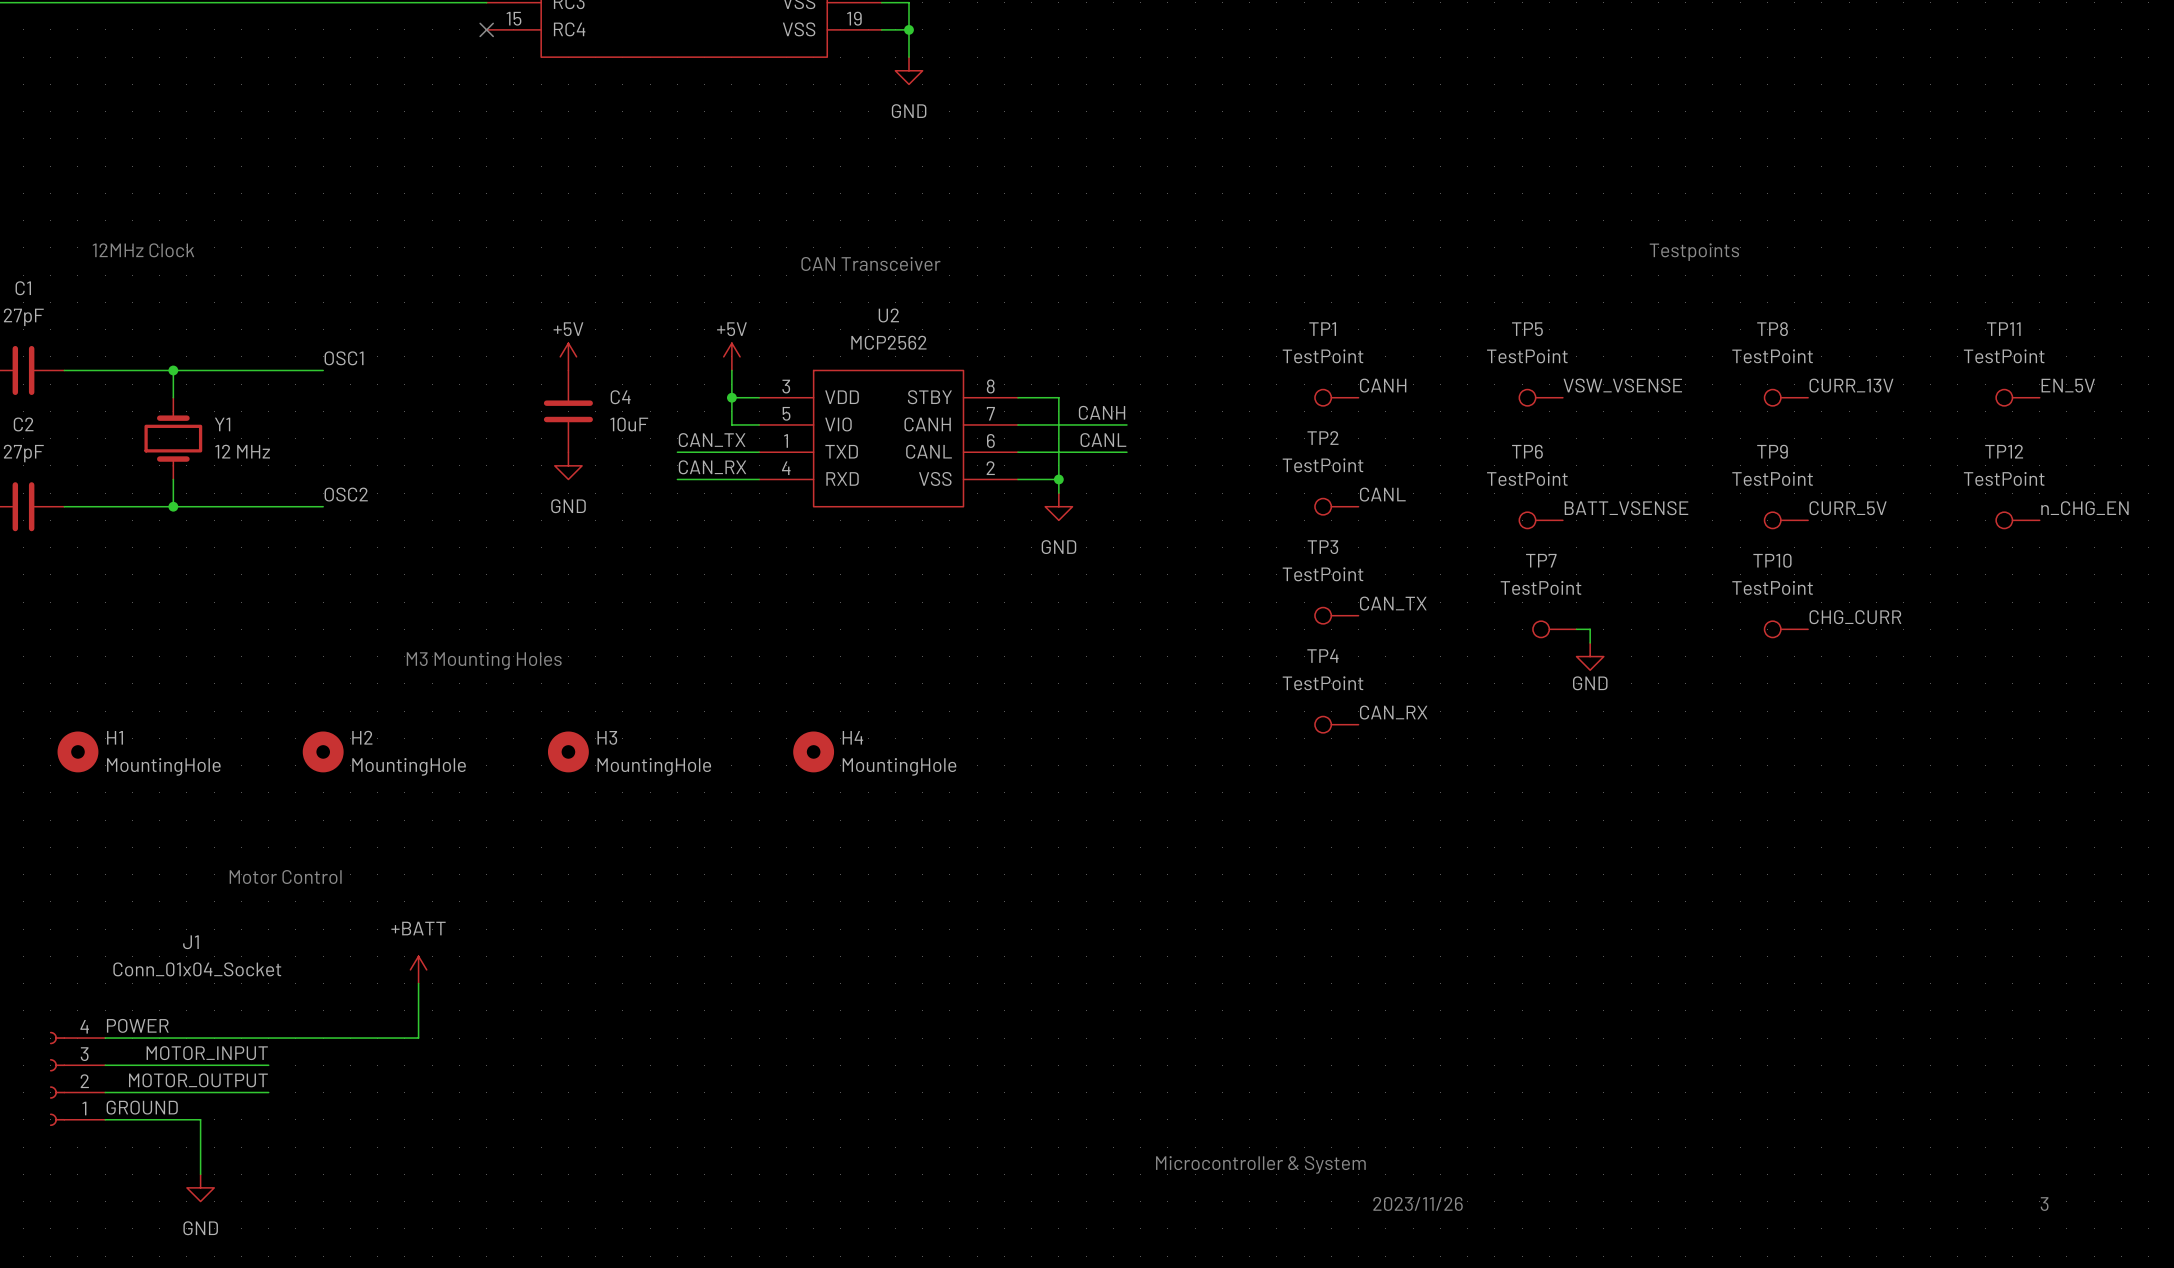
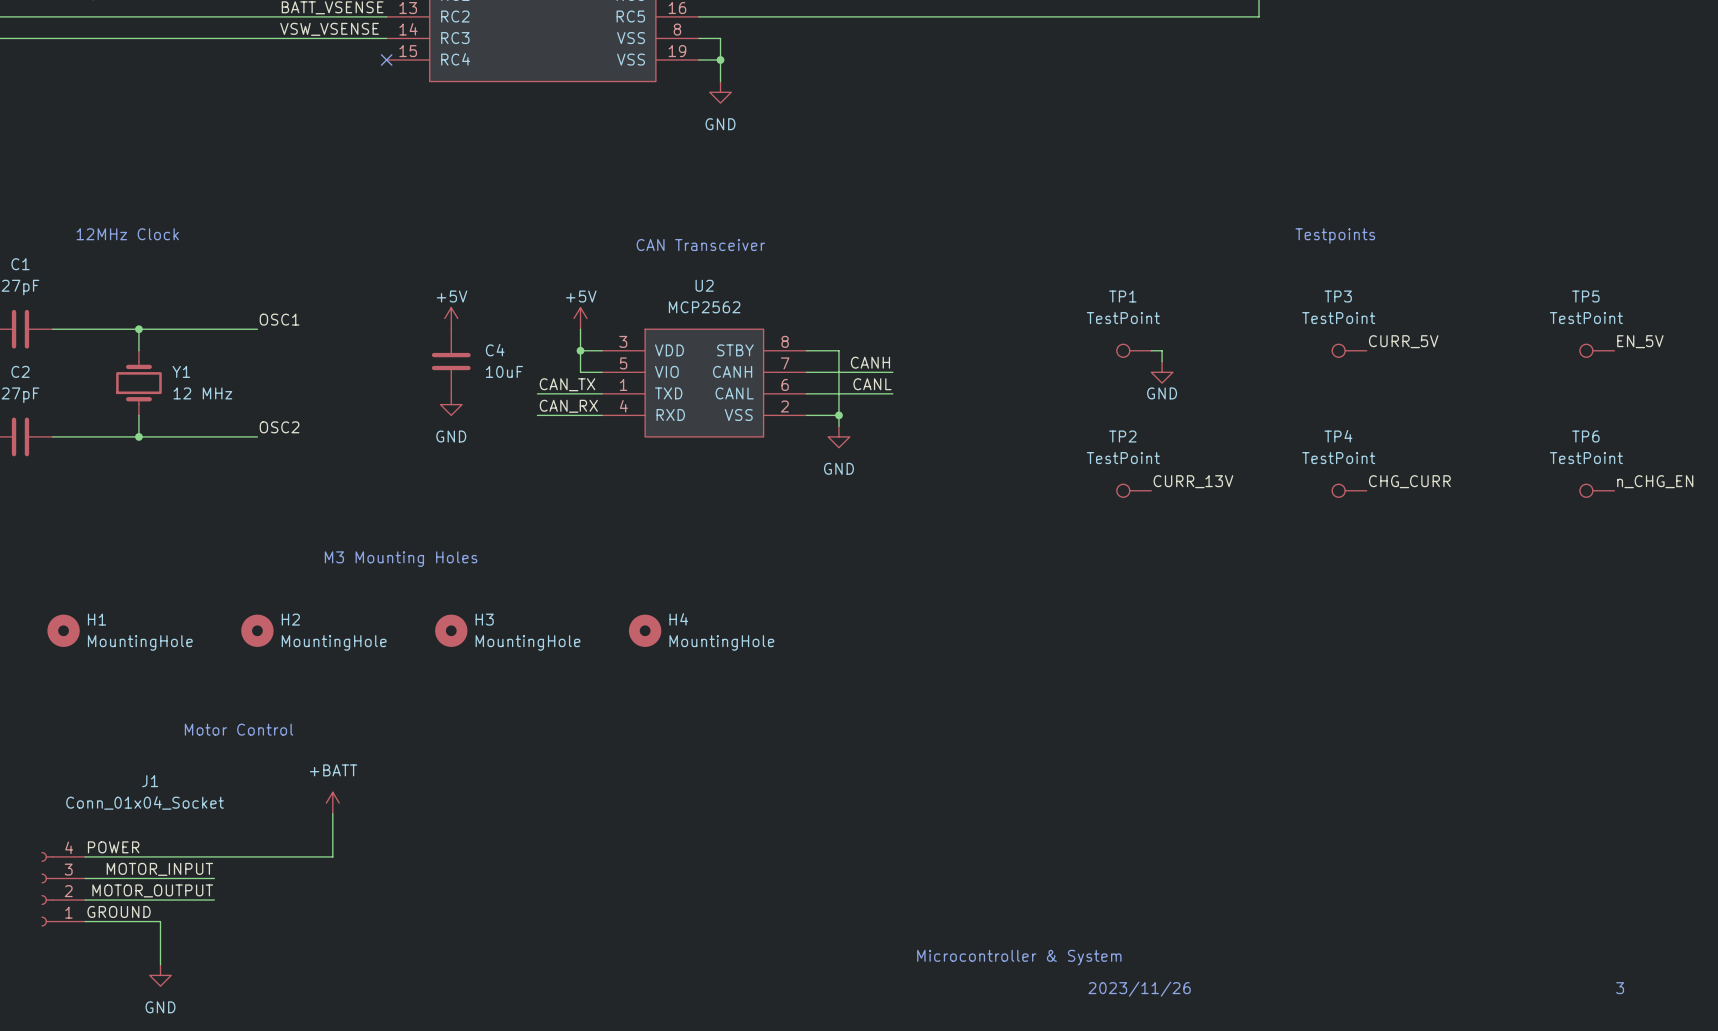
TP11 name: TP11 (2003, 329) -> TP5 (1585, 296)
label: CANH (1383, 385) -> none
label: VSW_VSENSE (1622, 385) -> none
label: CURR_13V (1851, 385) -> none
TP1 position: (1336, 397) -> (1134, 350)
TP5: TestPoint (1541, 397) -> none
TP8: TestPoint (1786, 397) -> none
label: CANL (1382, 494) -> none
TP2 position: (1336, 506) -> (1134, 490)
label: BATT_VSENSE (1626, 508) -> none
label position: CURR_5V (1848, 508) -> CURR_5V (1403, 341)
label position: n_CHG_EN (2084, 508) -> n_CHG_EN (1655, 481)
TP6 position: (1541, 520) -> (1597, 490)
TP9: TestPoint (1786, 520) -> none
TP12: TestPoint (2017, 520) -> none
label: none -> CURR_13V (1193, 481)
label: CAN_TX (1393, 603) -> none
TP3 position: (1336, 615) -> (1349, 350)
label position: CHG_CURR (1855, 617) -> CHG_CURR (1409, 481)
TP7: TestPoint (1554, 629) -> none
wire: (1576, 629) (1590, 629) (1590, 642) -> (1151, 350) (1162, 350) (1162, 361)
TP10: TestPoint (1786, 629) -> none
power symbol position: GND (1590, 656) -> GND (1162, 372)
label: CAN_RX (1393, 712) -> none
TP4 position: (1336, 724) -> (1349, 490)

